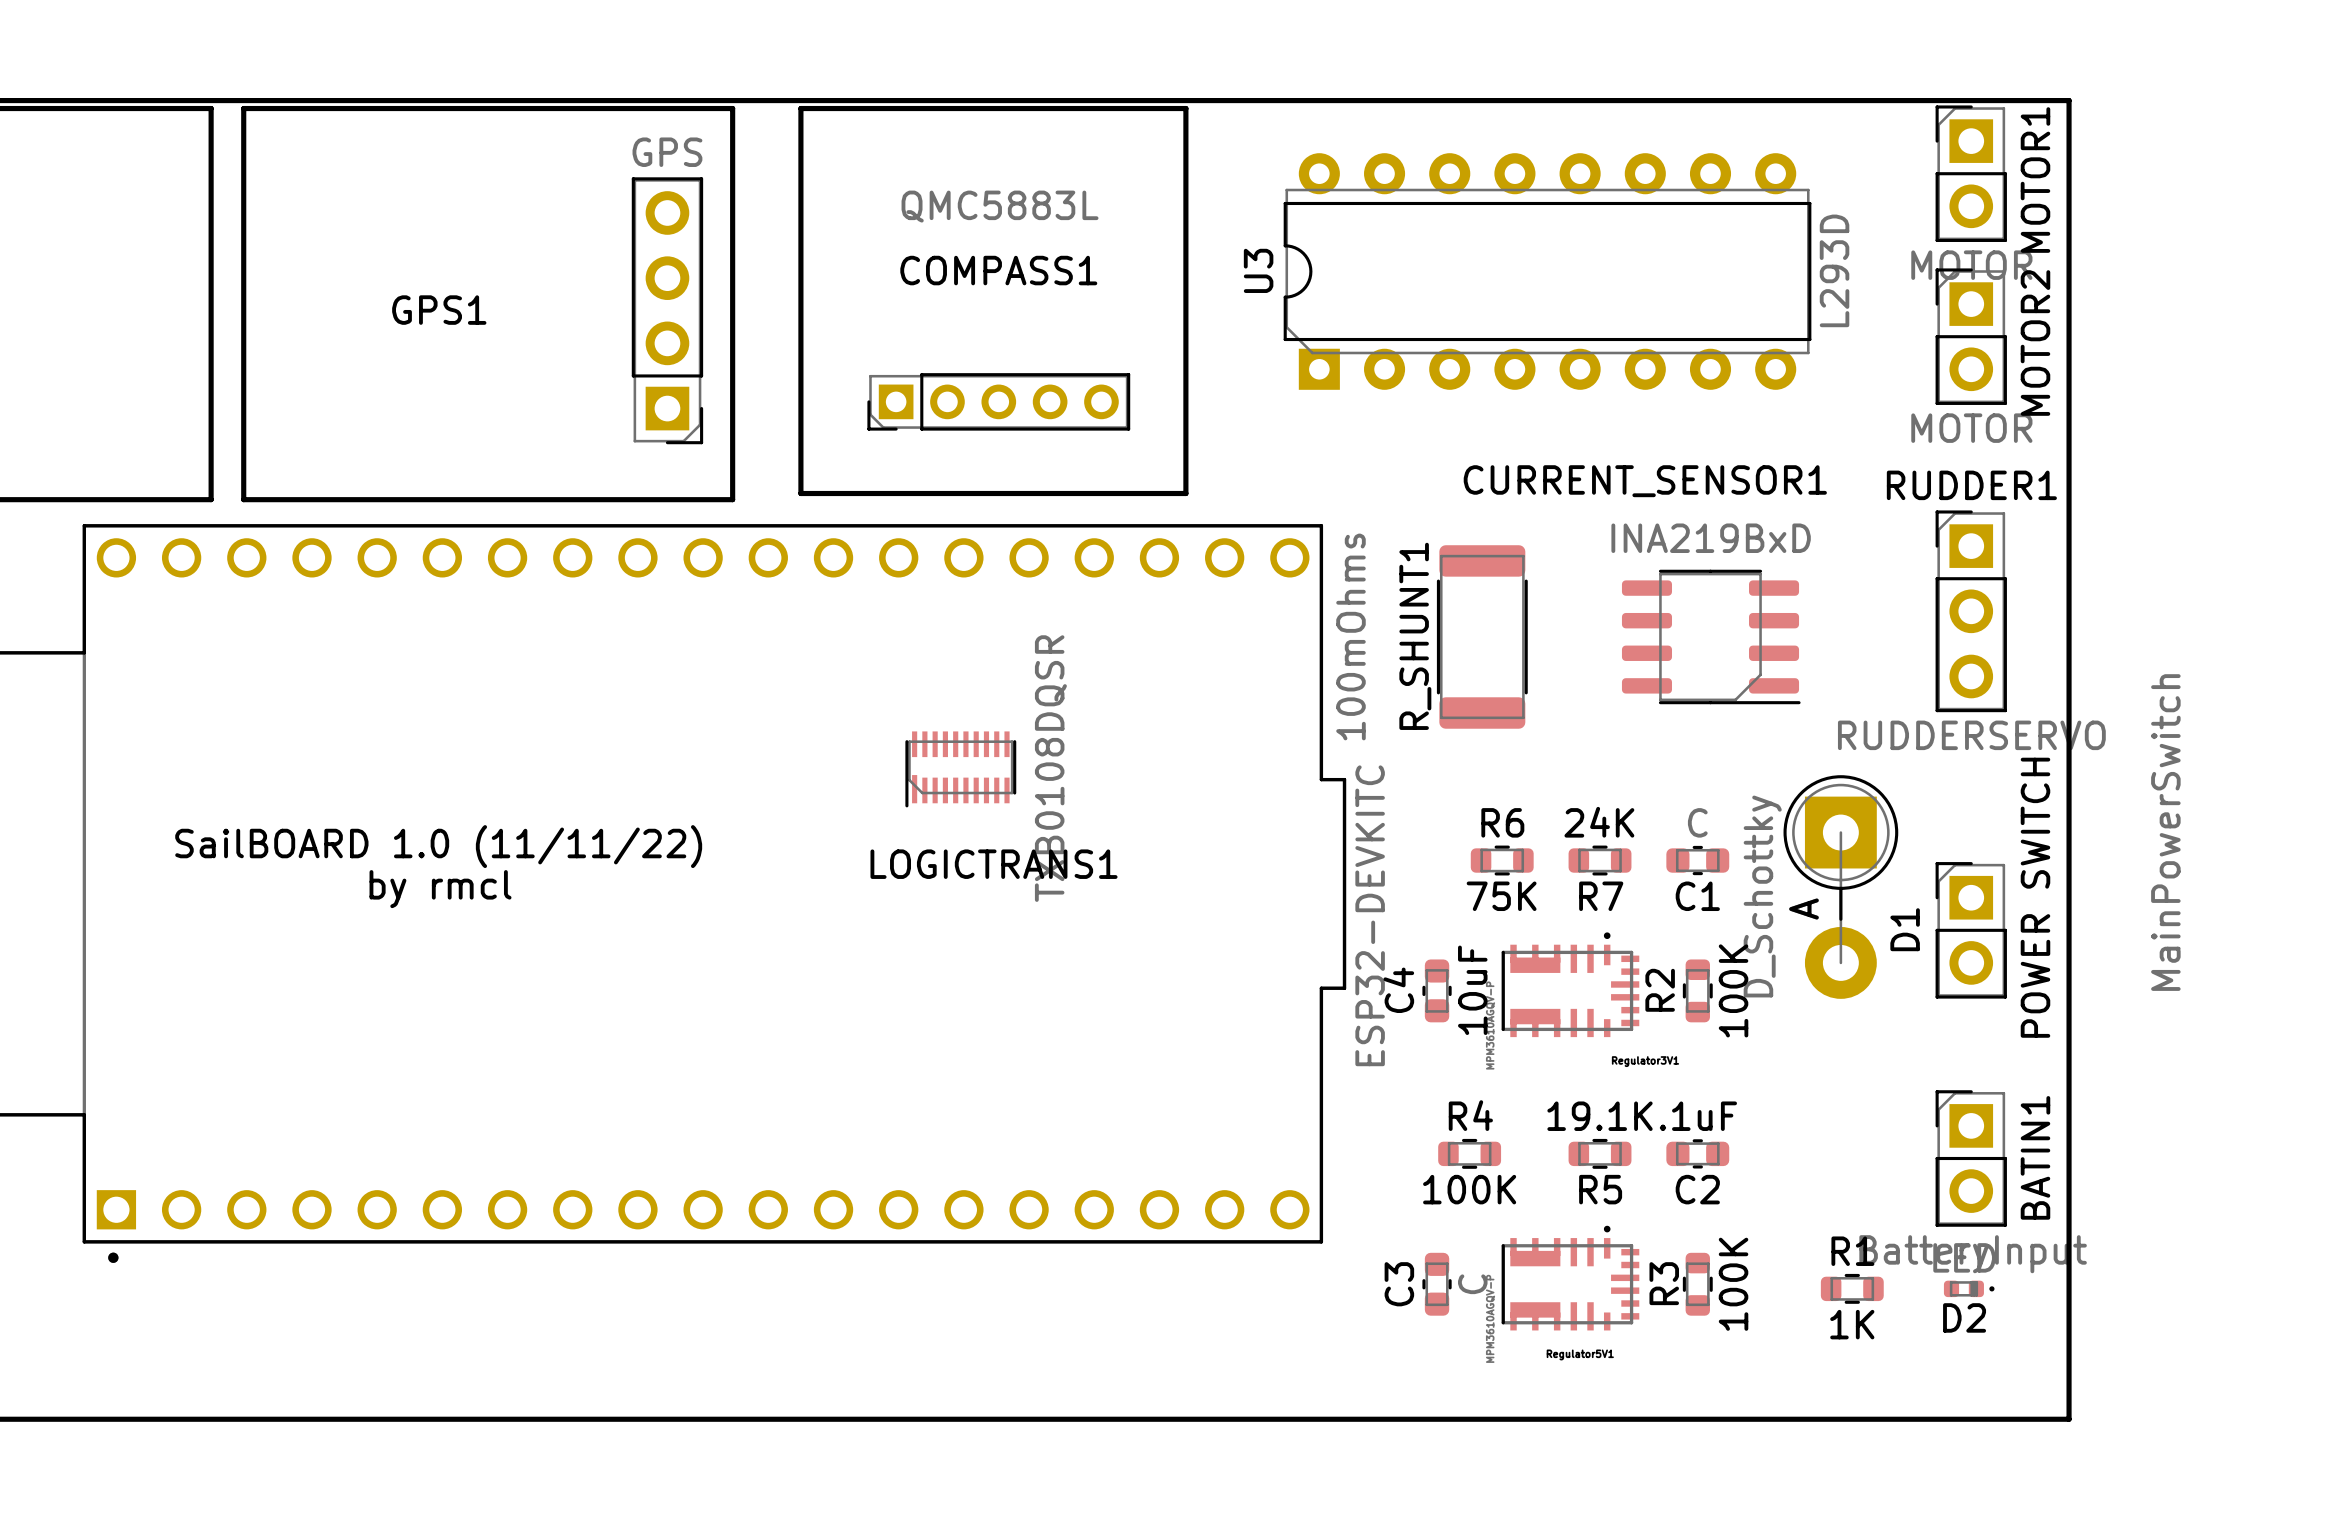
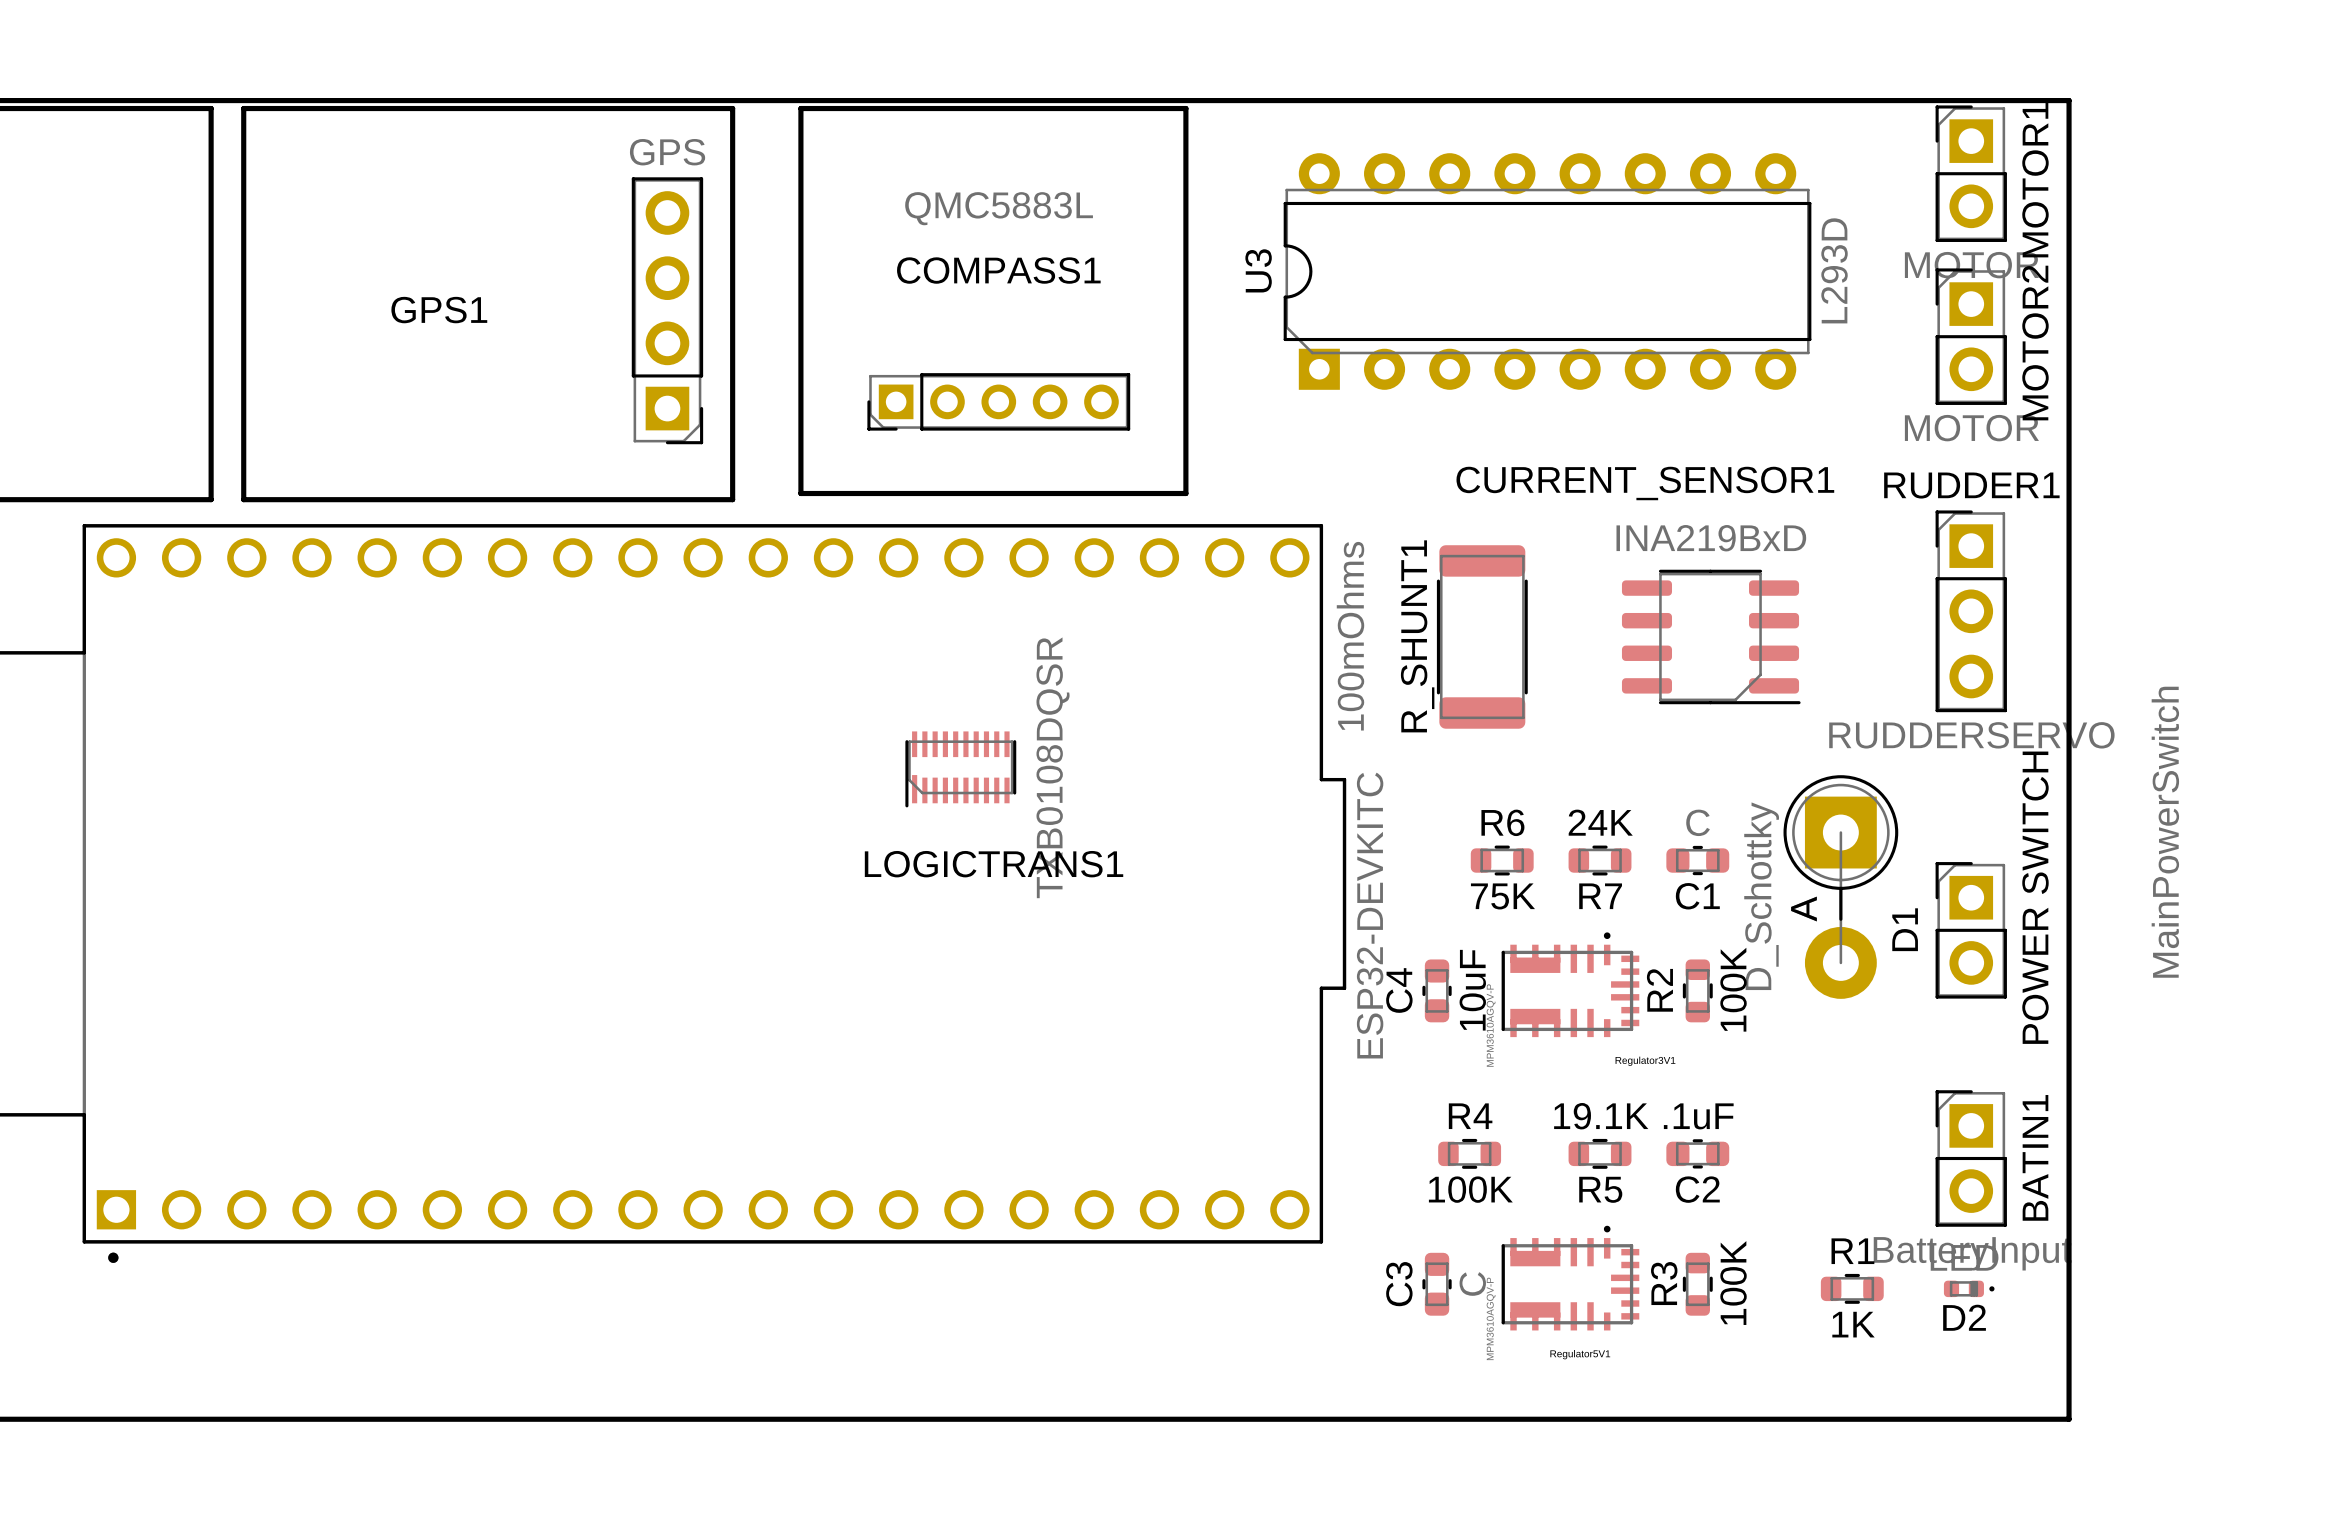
text: SailBOARD 1.0 (11/11/22) (438, 846) -> none
text: by rmcl (440, 889) -> none

